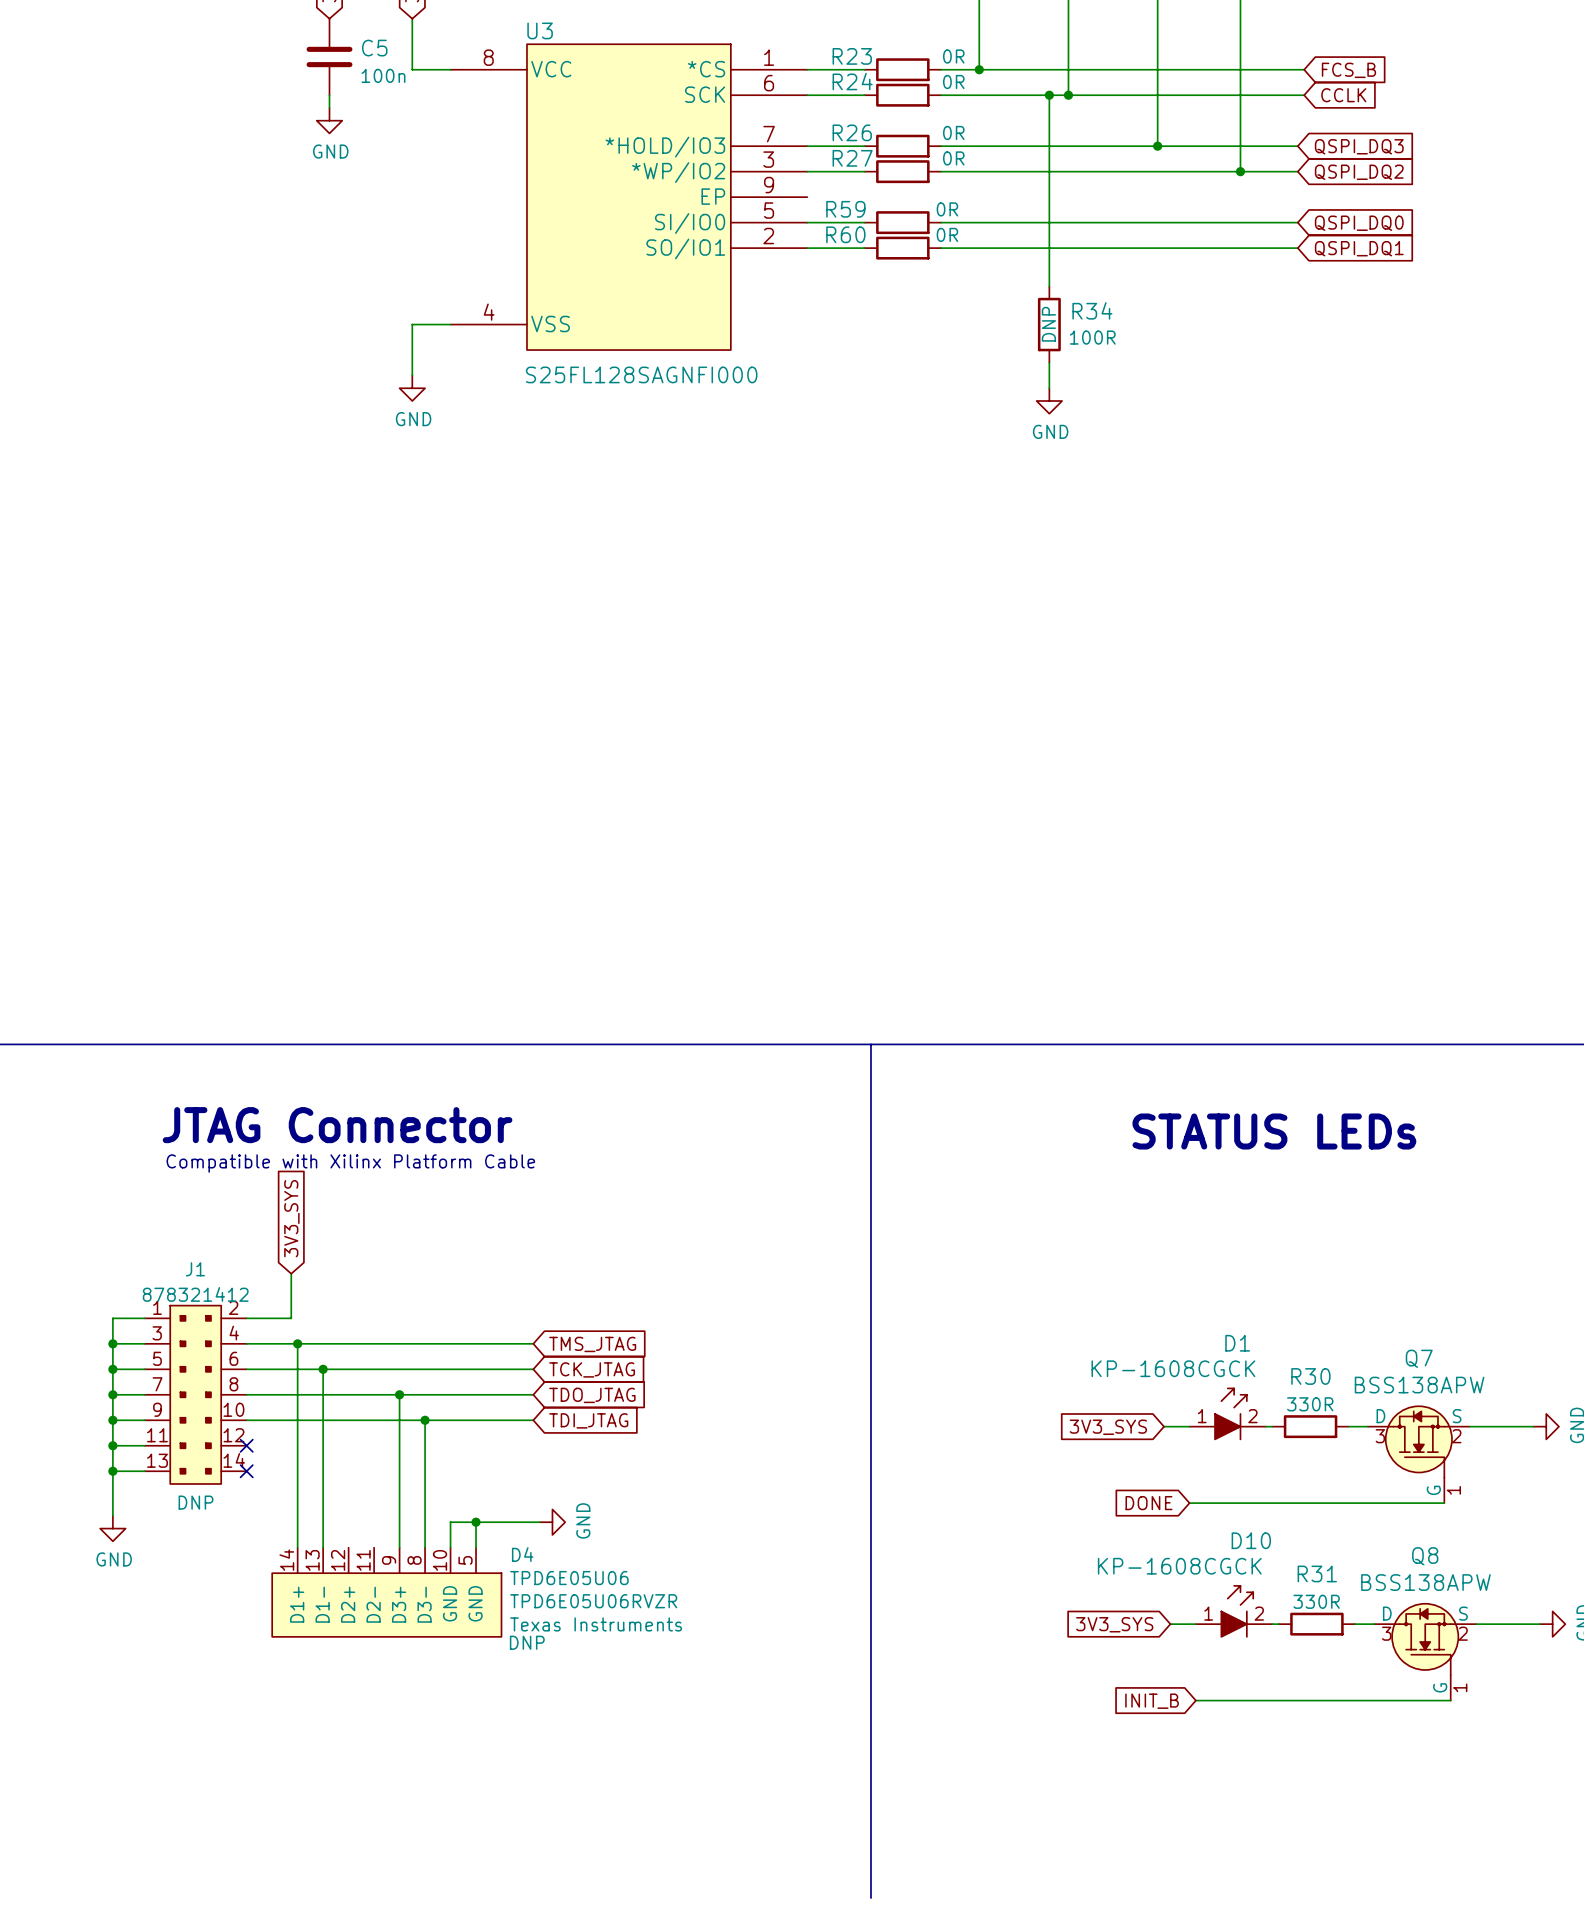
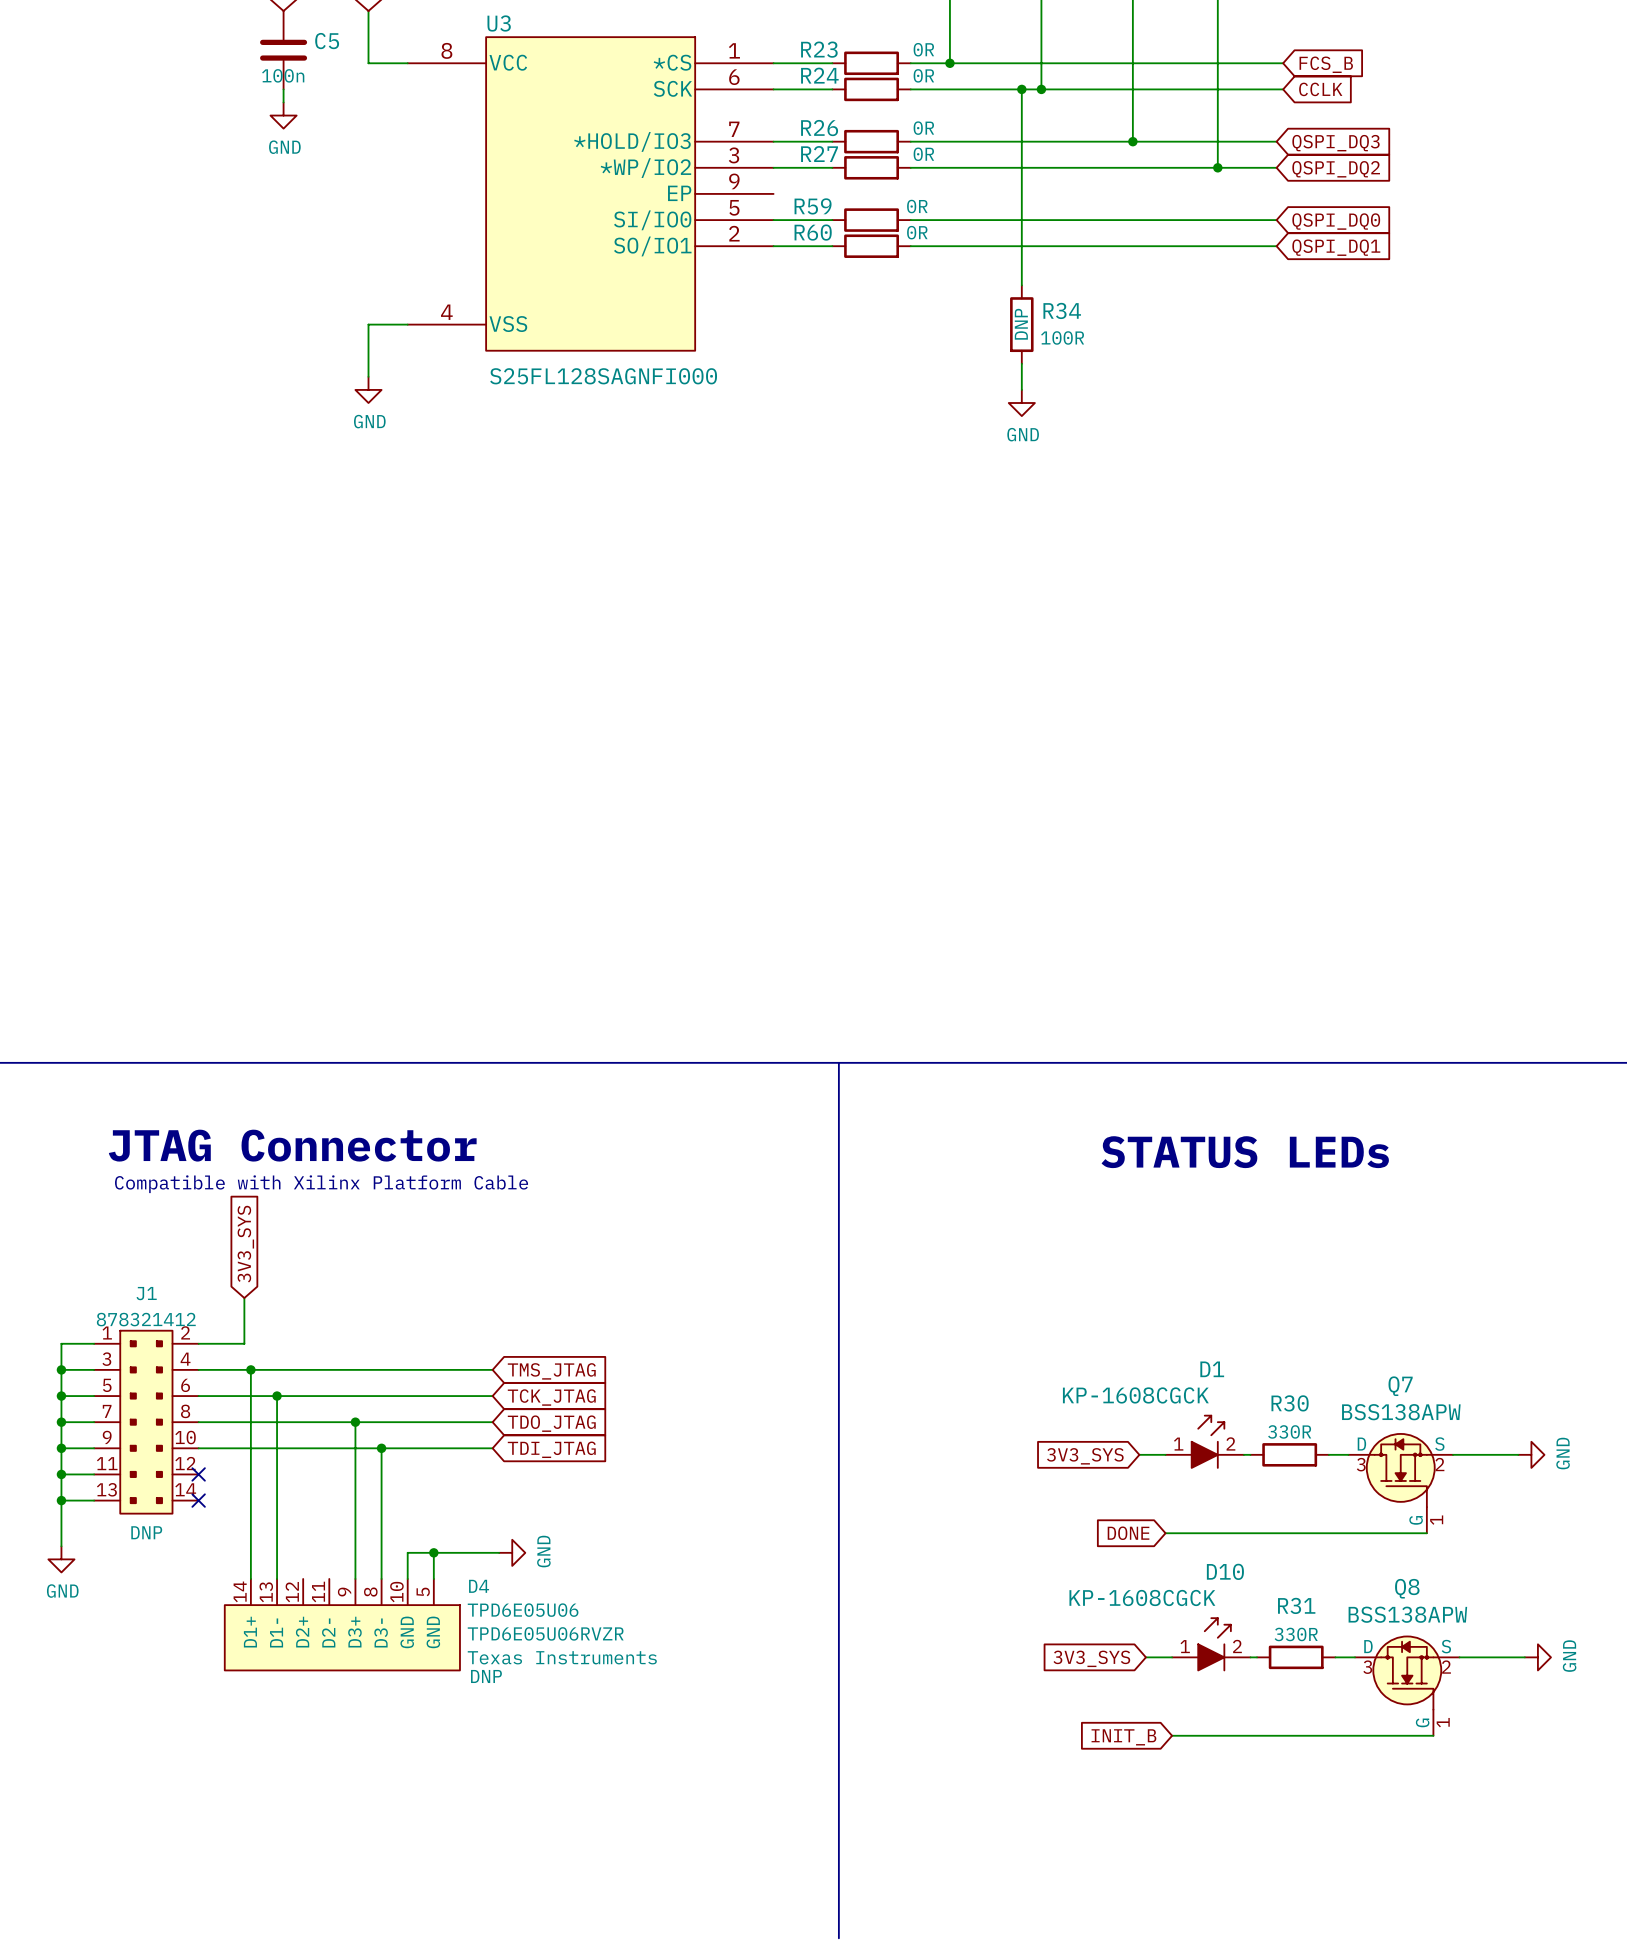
C5 text position: 100n (383, 75) -> 100n (283, 75)

